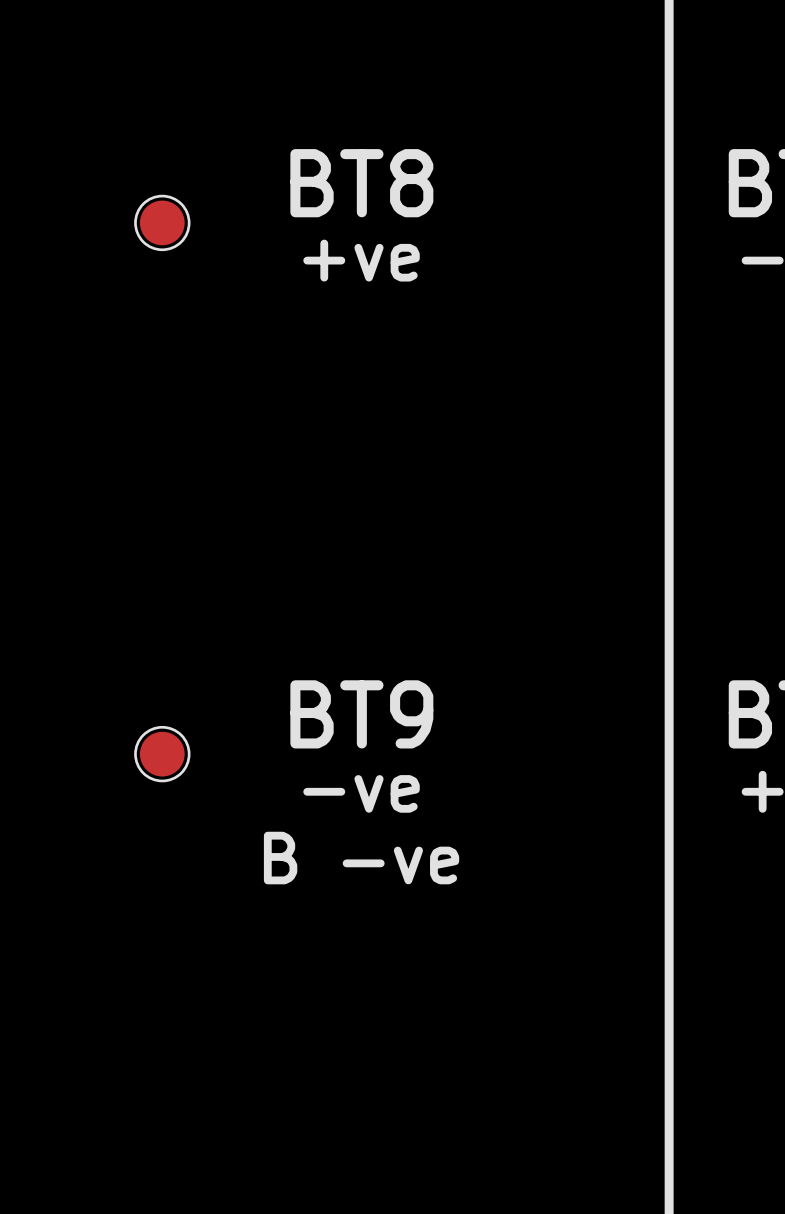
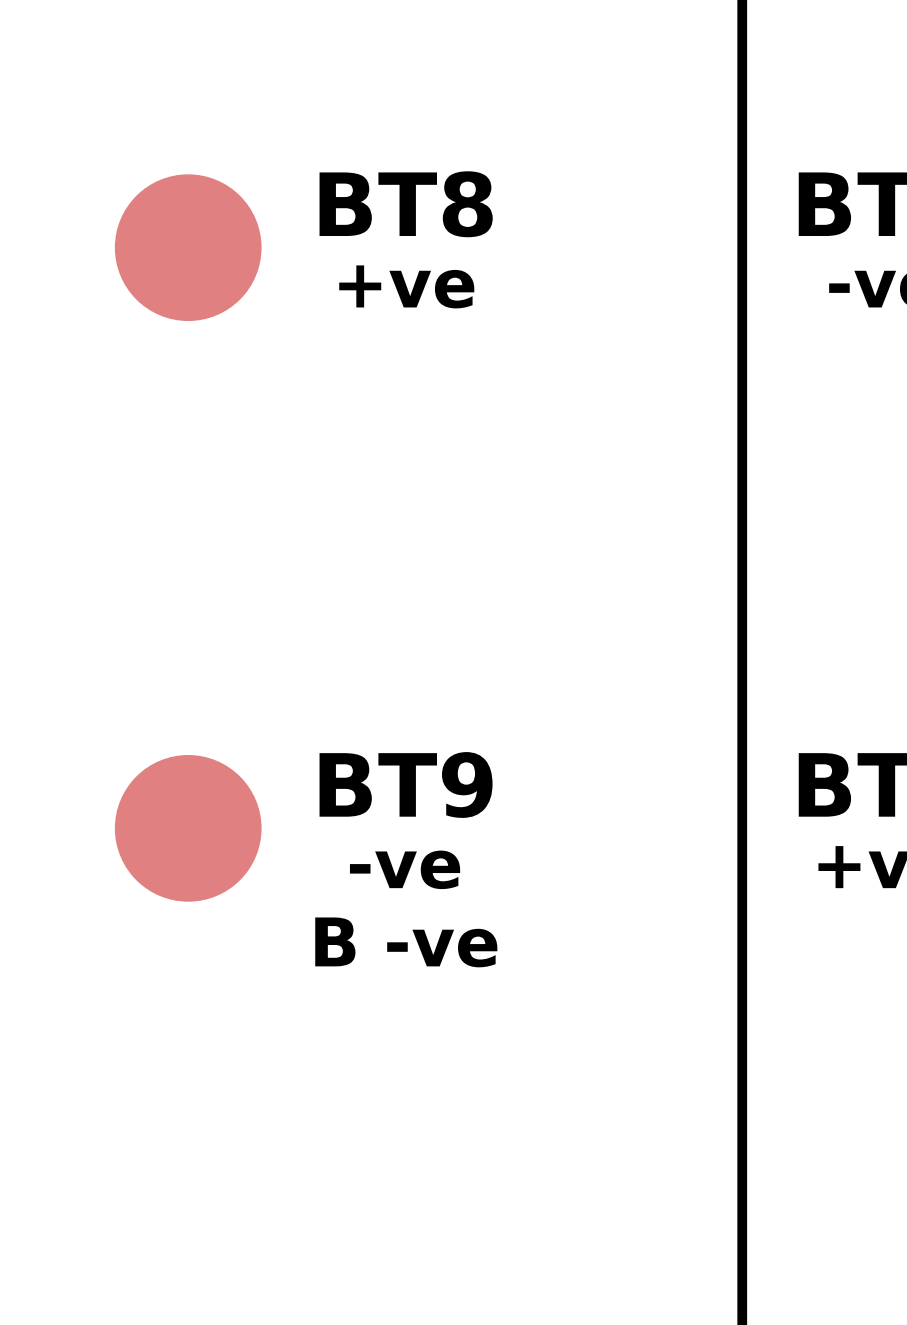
part footprint: [134, 194, 191, 252] -> [114, 174, 262, 322]
part footprint: [134, 725, 191, 783] -> [114, 755, 262, 902]

